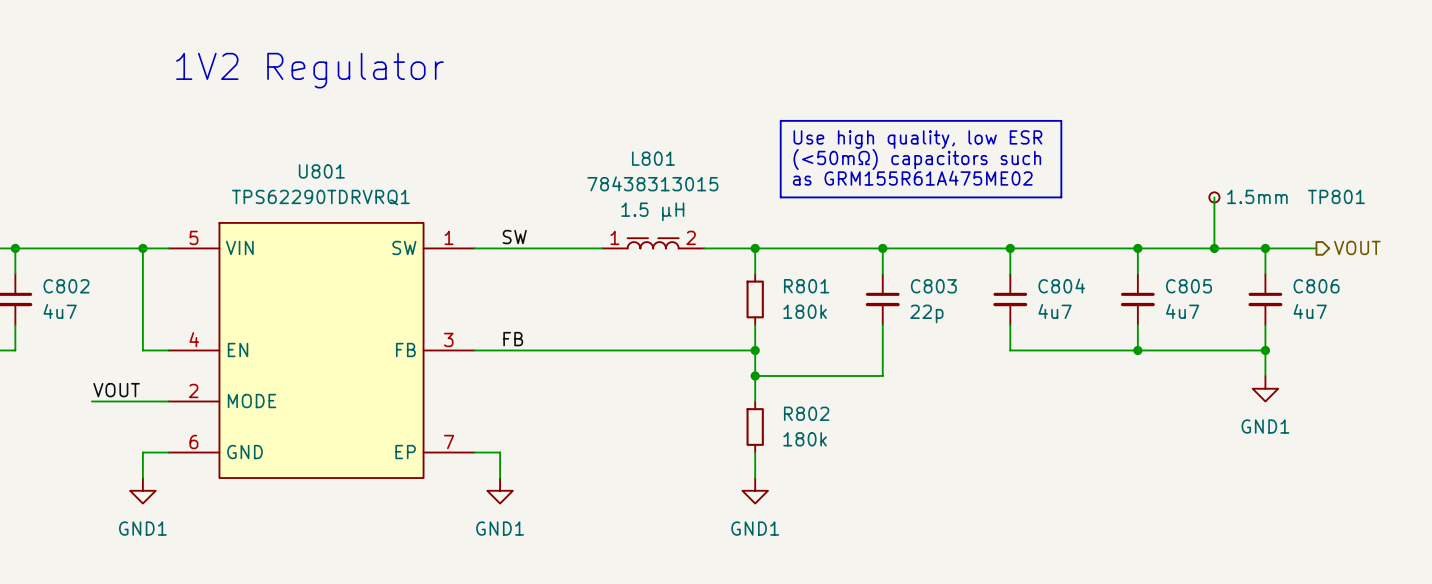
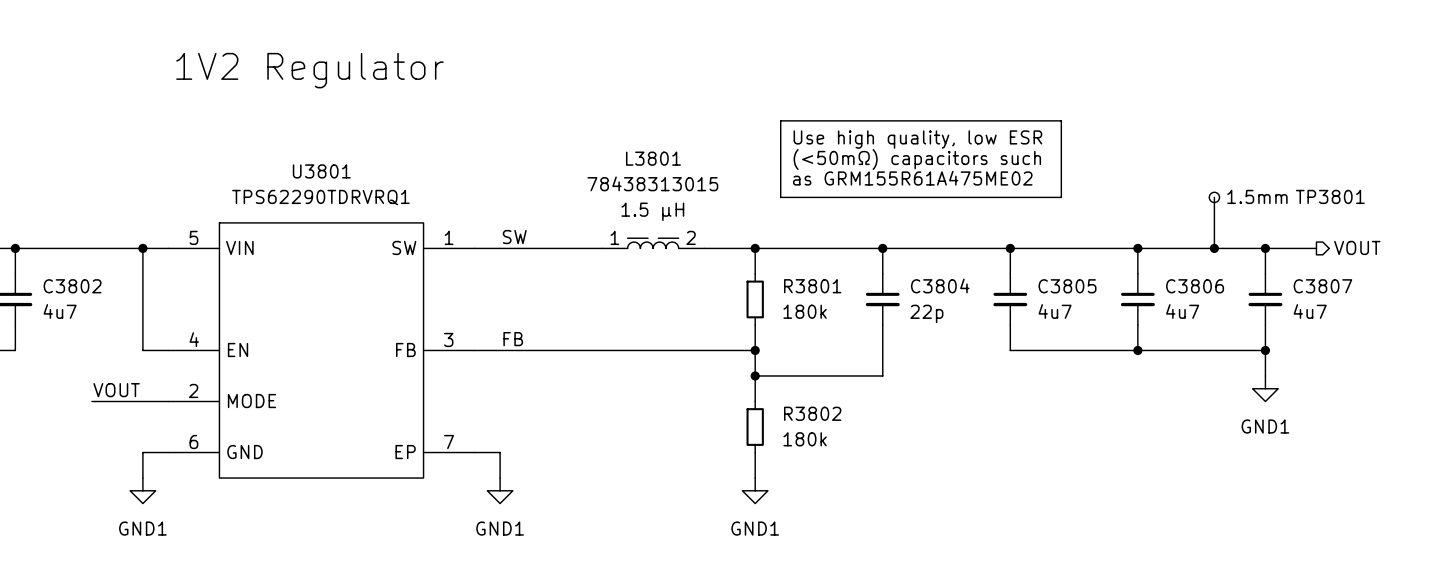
L801 name: L801 (653, 158) -> L3801 (653, 158)
U801 name: U801 (321, 171) -> U3801 (321, 171)
TP801 name: TP801 (1336, 196) -> TP3801 (1330, 196)
C804 name: C804 (1061, 285) -> C3805 (1067, 286)
C802 name: C802 (66, 286) -> C3802 (72, 286)
R801 name: R801 (806, 286) -> R3801 (812, 286)
C803 name: C803 (933, 286) -> C3804 (940, 285)
C805 name: C805 (1188, 286) -> C3806 (1195, 286)
C806 name: C806 (1316, 286) -> C3807 (1322, 286)
R802 name: R802 (806, 413) -> R3802 (812, 413)

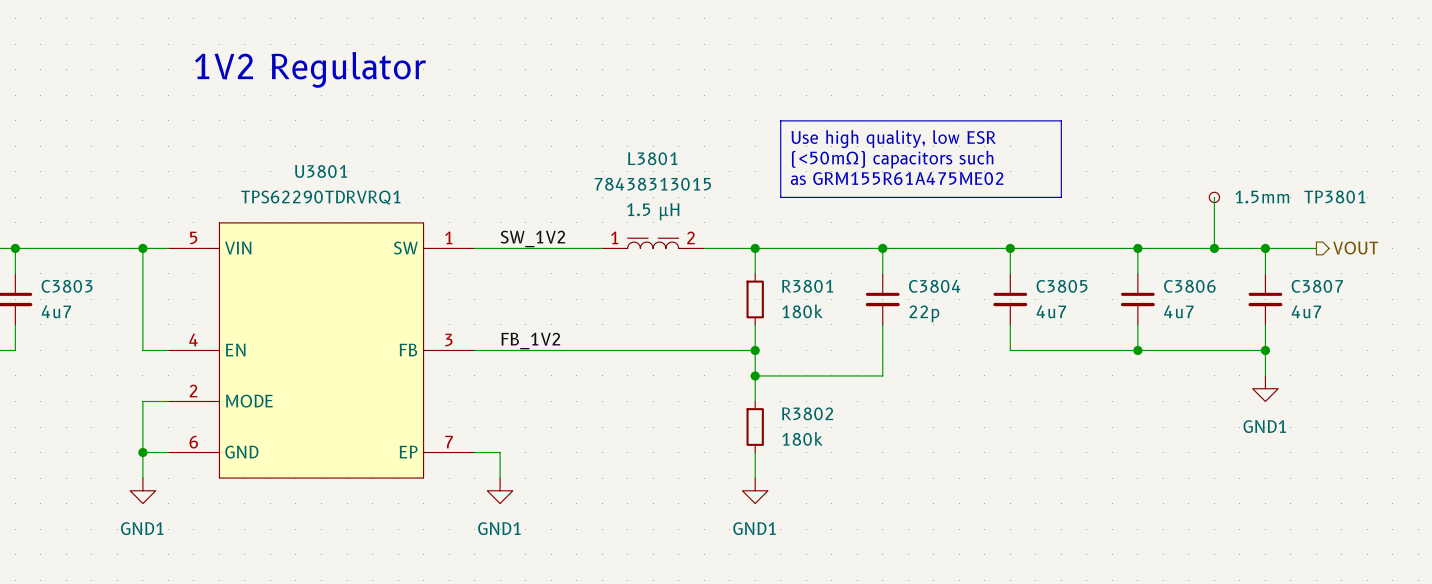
label: SW (514, 237) -> SW_1V2 (532, 238)
C3802 name: C3802 (72, 286) -> C3803 (67, 286)
label: FB (513, 339) -> FB_1V2 (530, 341)
label: VOUT (116, 390) -> none
wire: (91, 401) (142, 401) -> (142, 452) (142, 401)
junction: none -> (142, 452)

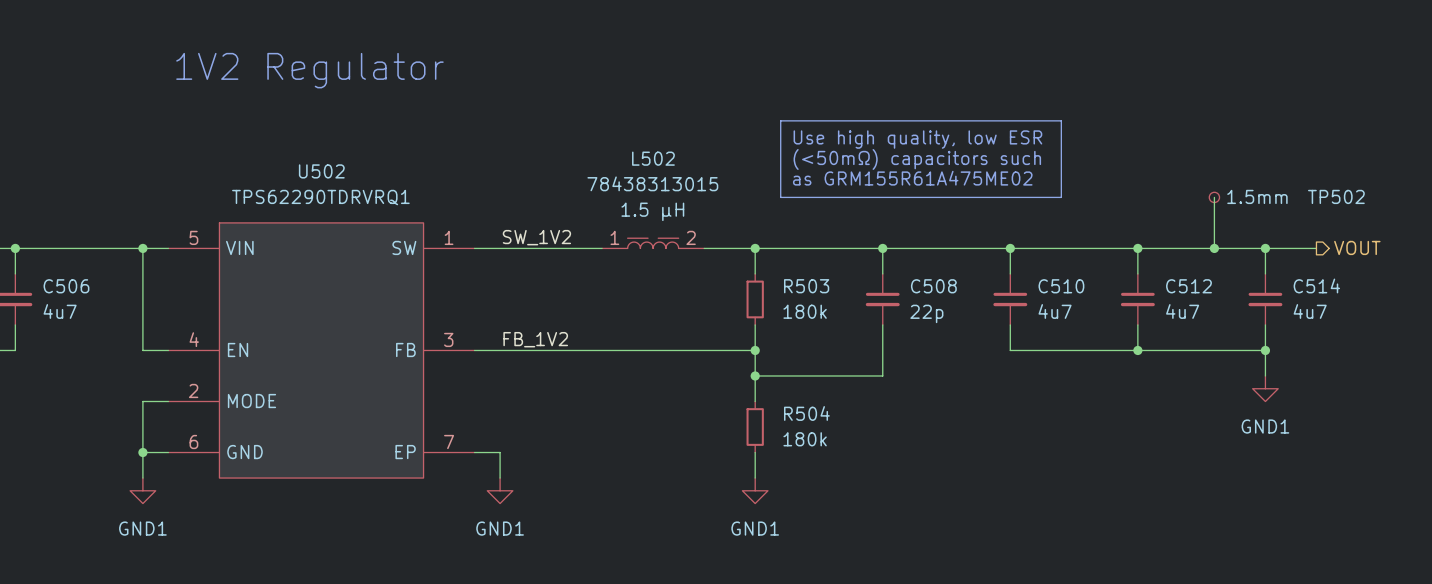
L3801 name: L3801 (652, 158) -> L502 (653, 158)
U3801 name: U3801 (321, 171) -> U502 (321, 171)
TP3801 name: TP3801 (1334, 197) -> TP502 (1336, 196)
C3803 name: C3803 (67, 286) -> C506 (66, 286)
R3801 name: R3801 (807, 286) -> R503 (806, 286)
C3804 name: C3804 (934, 286) -> C508 (933, 286)
C3805 name: C3805 (1062, 286) -> C510 (1061, 286)
C3806 name: C3806 (1189, 286) -> C512 (1188, 286)
C3807 name: C3807 (1317, 286) -> C514 (1316, 285)
R3802 name: R3802 (807, 413) -> R504 (806, 413)

